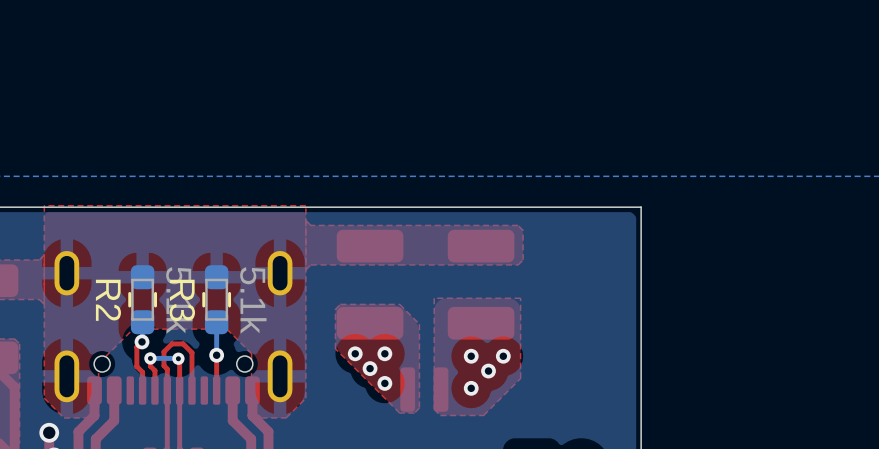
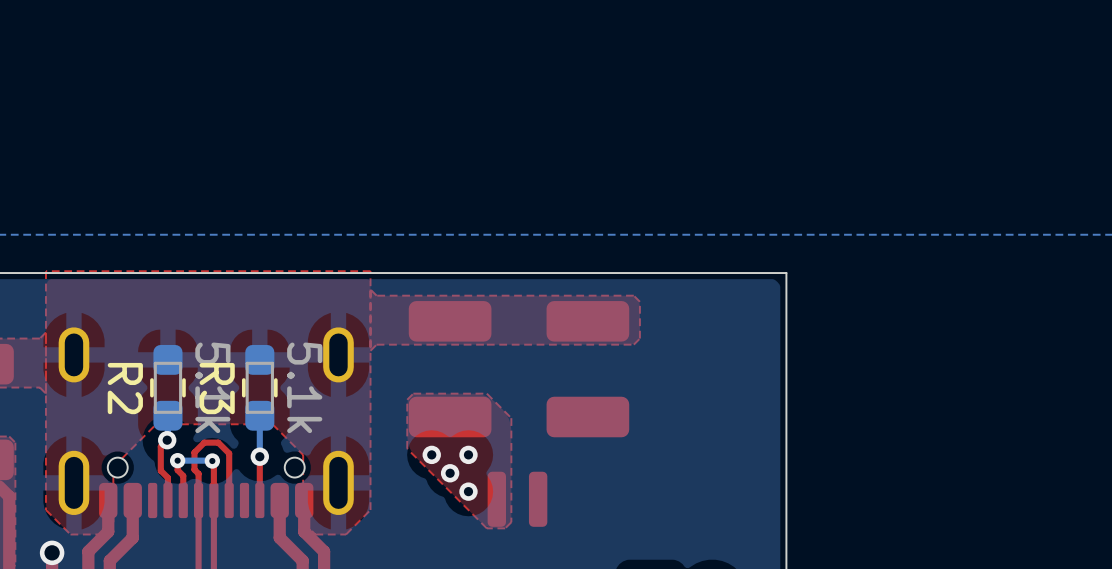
top zone outline: (520, 298) (434, 298) (434, 409) (440, 415) (483, 415) (520, 378) (520, 298) -> none
via: (471, 356) -> none
via: (503, 356) -> none
via: (488, 371) -> none
via: (471, 388) -> none

